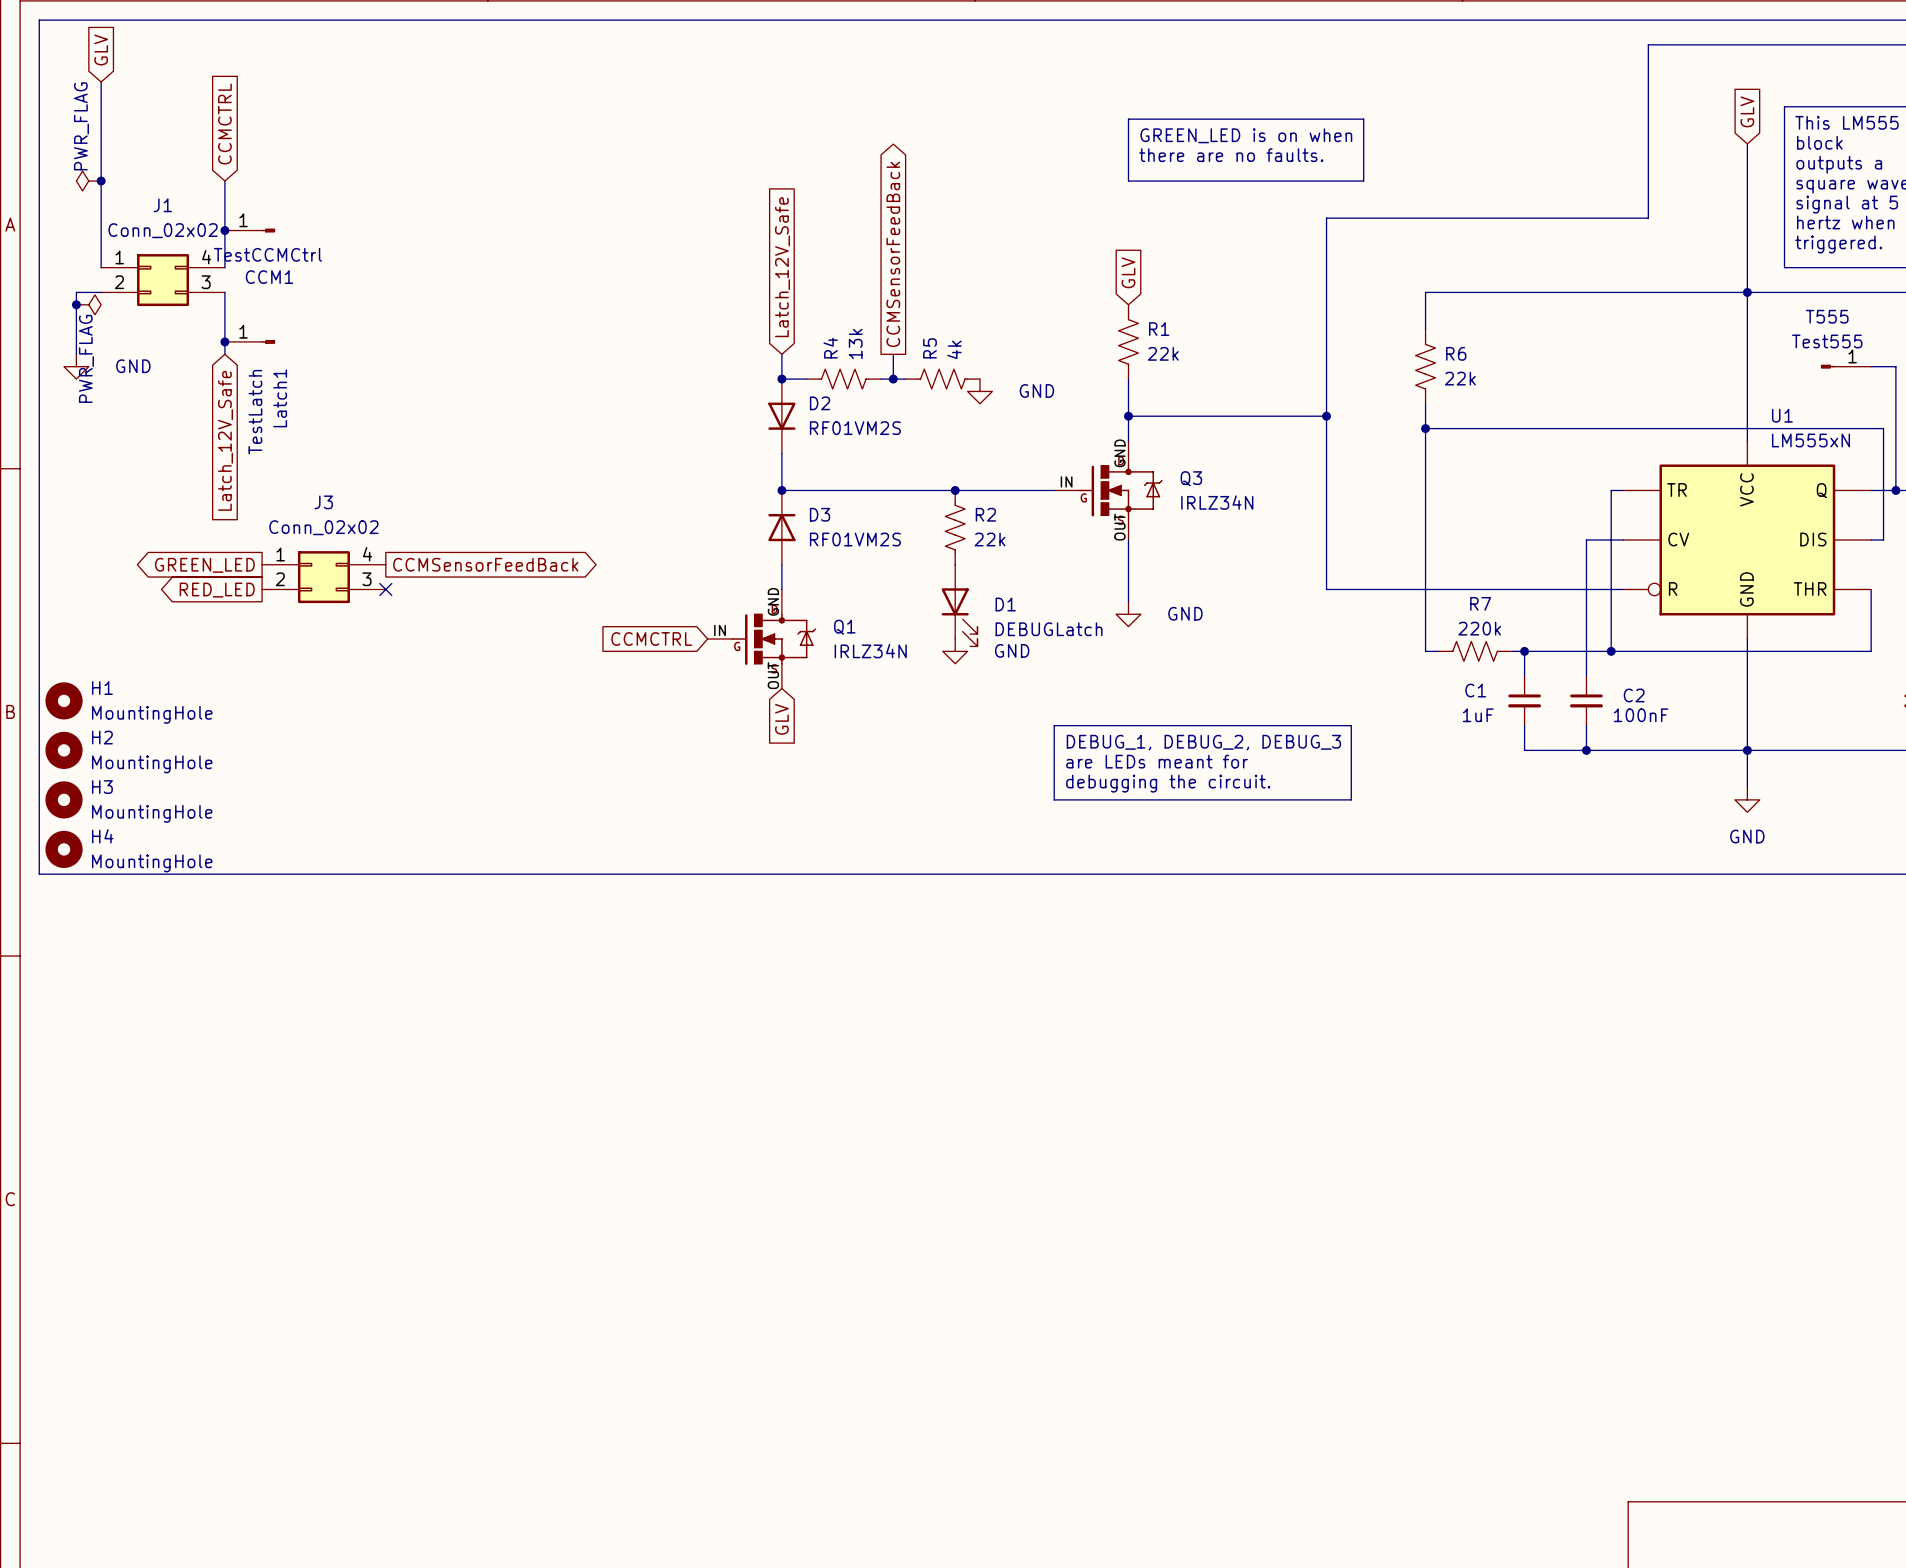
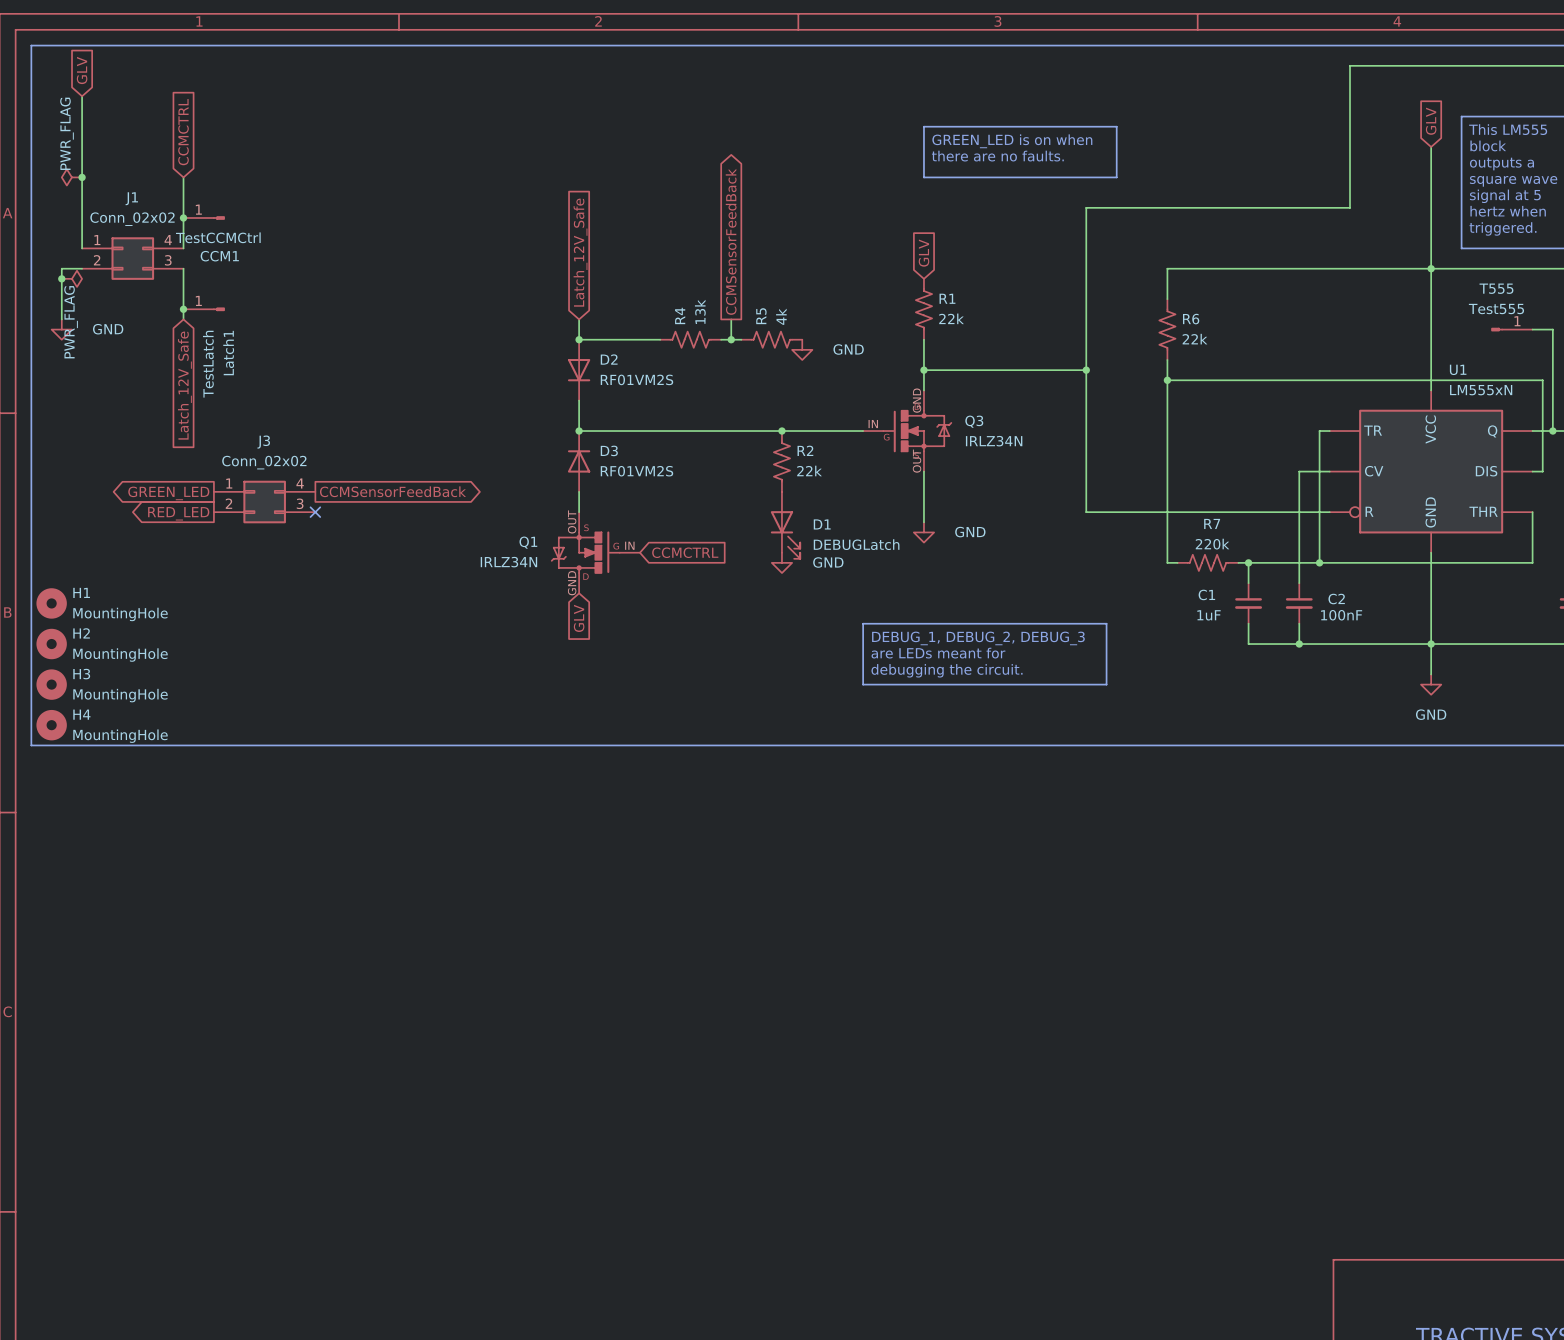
global label position: Latch_12V_Safe (782, 267) -> Latch_12V_Safe (580, 252)
wire: (781, 354) (781, 379) -> (579, 319) (579, 339) (639, 339)
junction: none -> (579, 339)
junction: (781, 379) -> none
D2 position: (781, 416) -> (579, 370)
wire: (781, 453) (781, 490) -> (579, 400) (579, 431) (639, 431)
junction: none -> (579, 431)
junction: (781, 490) -> none
D3 position: (781, 527) -> (579, 461)
wire: (781, 564) (781, 589) -> (579, 491) (579, 512)
Q1 name position: Q1 (844, 627) -> Q1 (528, 542)
global label rotation: 0° (651, 639) -> 180° (685, 552)
global label position: CCMCTRL (651, 639) -> CCMCTRL (685, 552)
Q1 rotation: 0° (773, 639) -> 180° (585, 552)
Q1 value position: IRLZ34N (870, 651) -> IRLZ34N (508, 562)
global label position: GLV (781, 719) -> GLV (579, 618)

